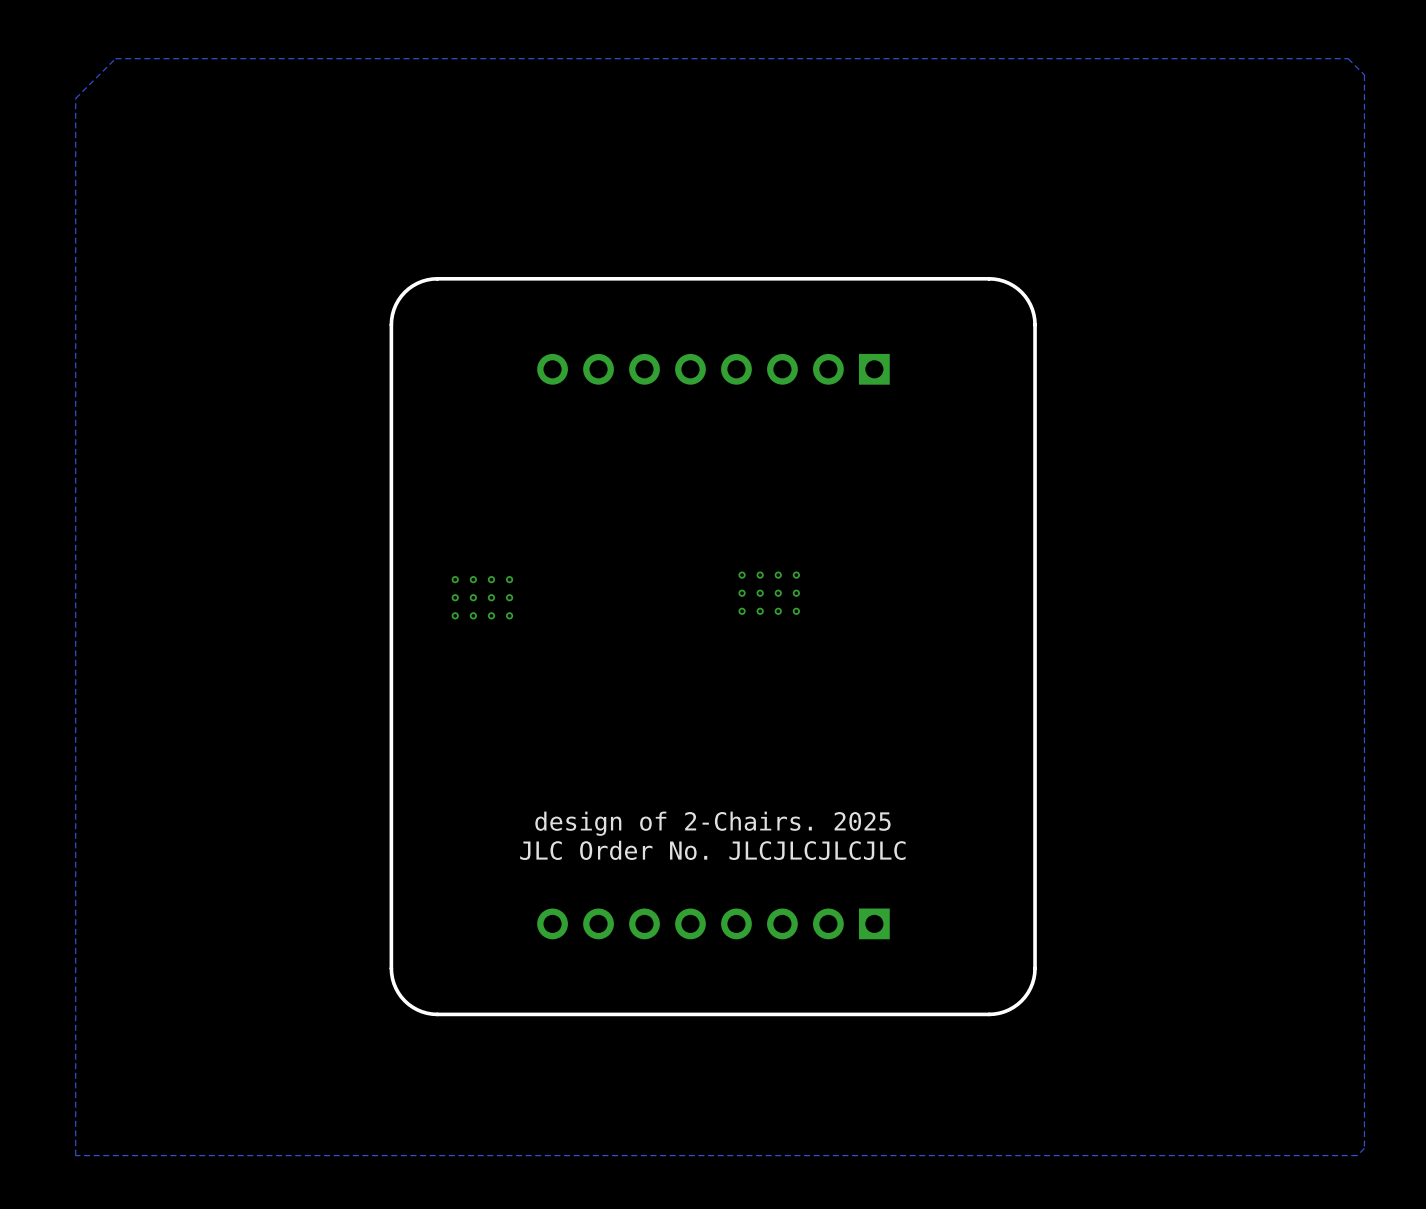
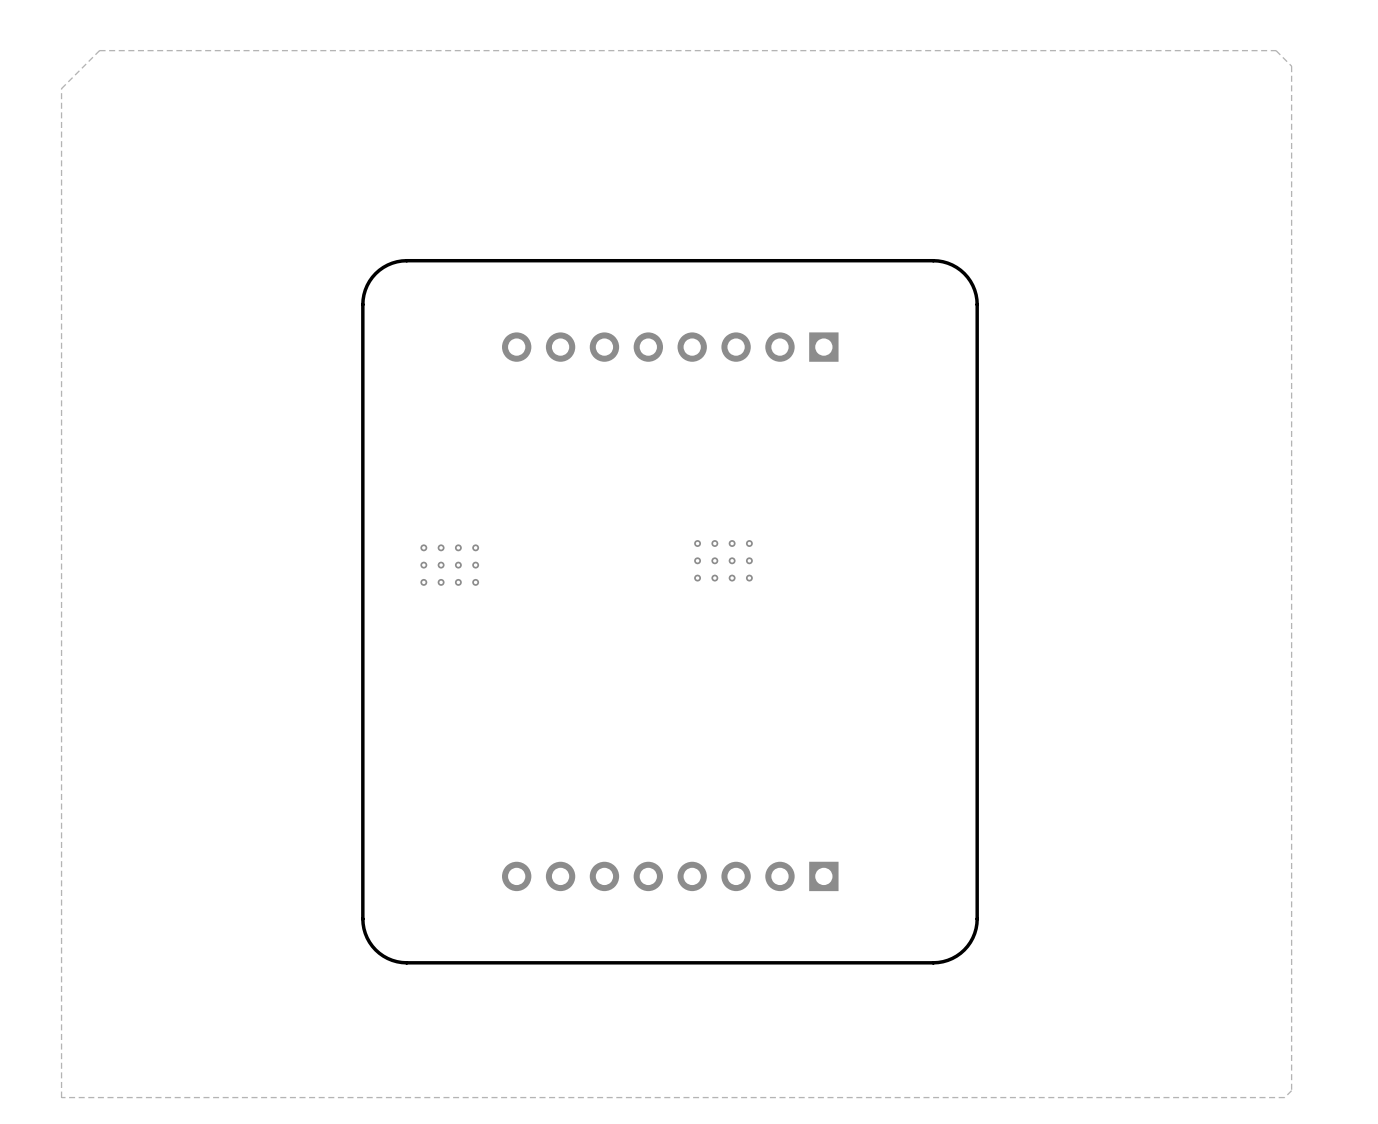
text: design of 2-Chairs. 2025 (712, 823) -> none
text: JLC Order No. JLCJLCJLCJLC (712, 850) -> none

